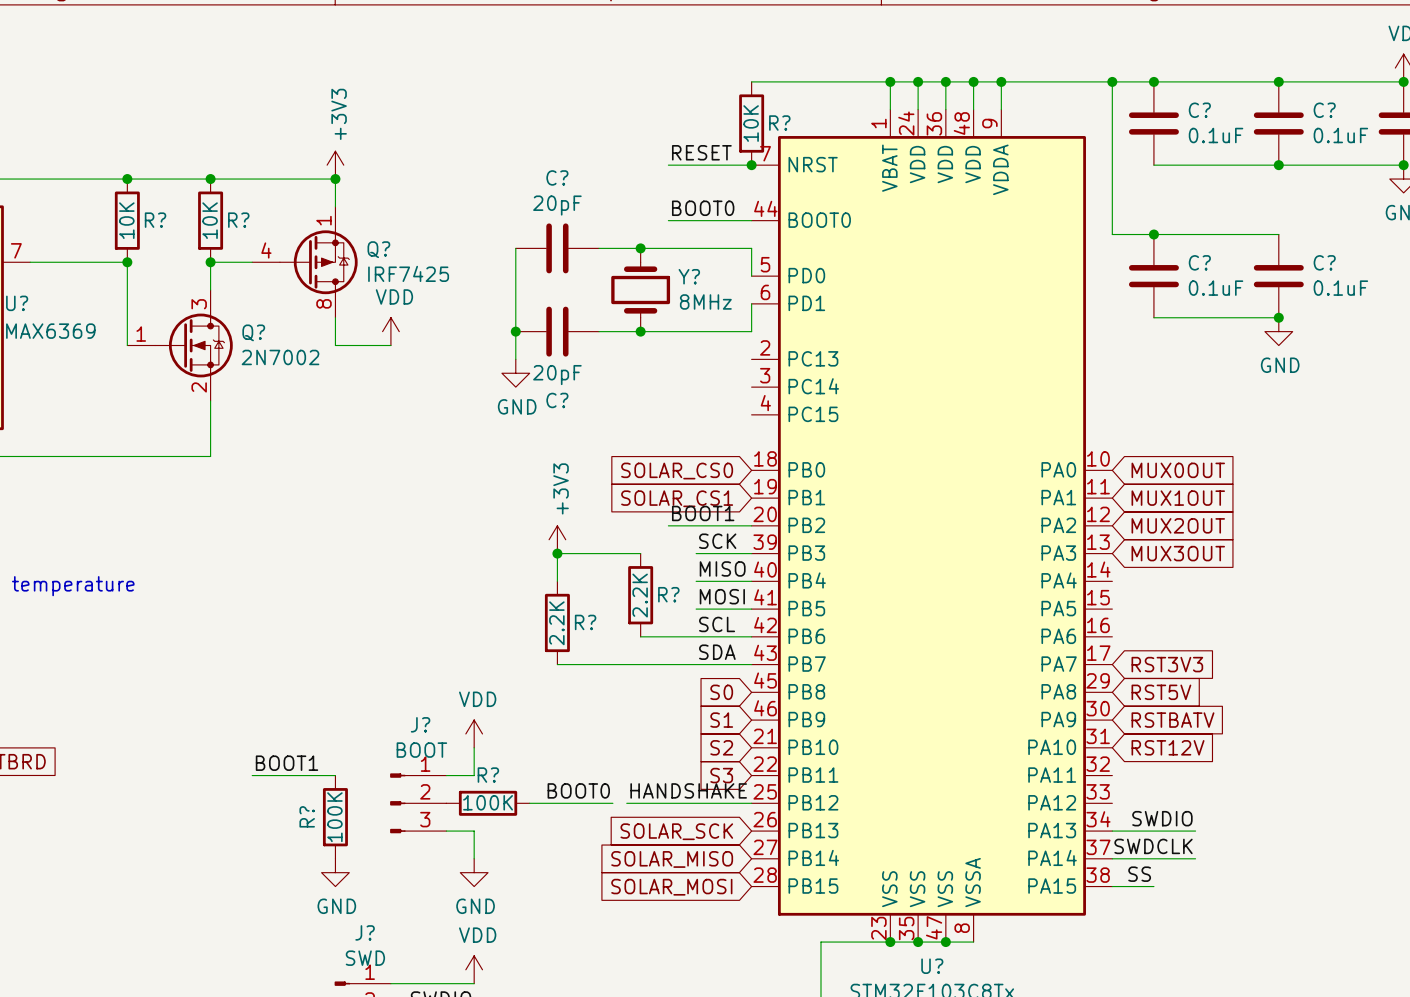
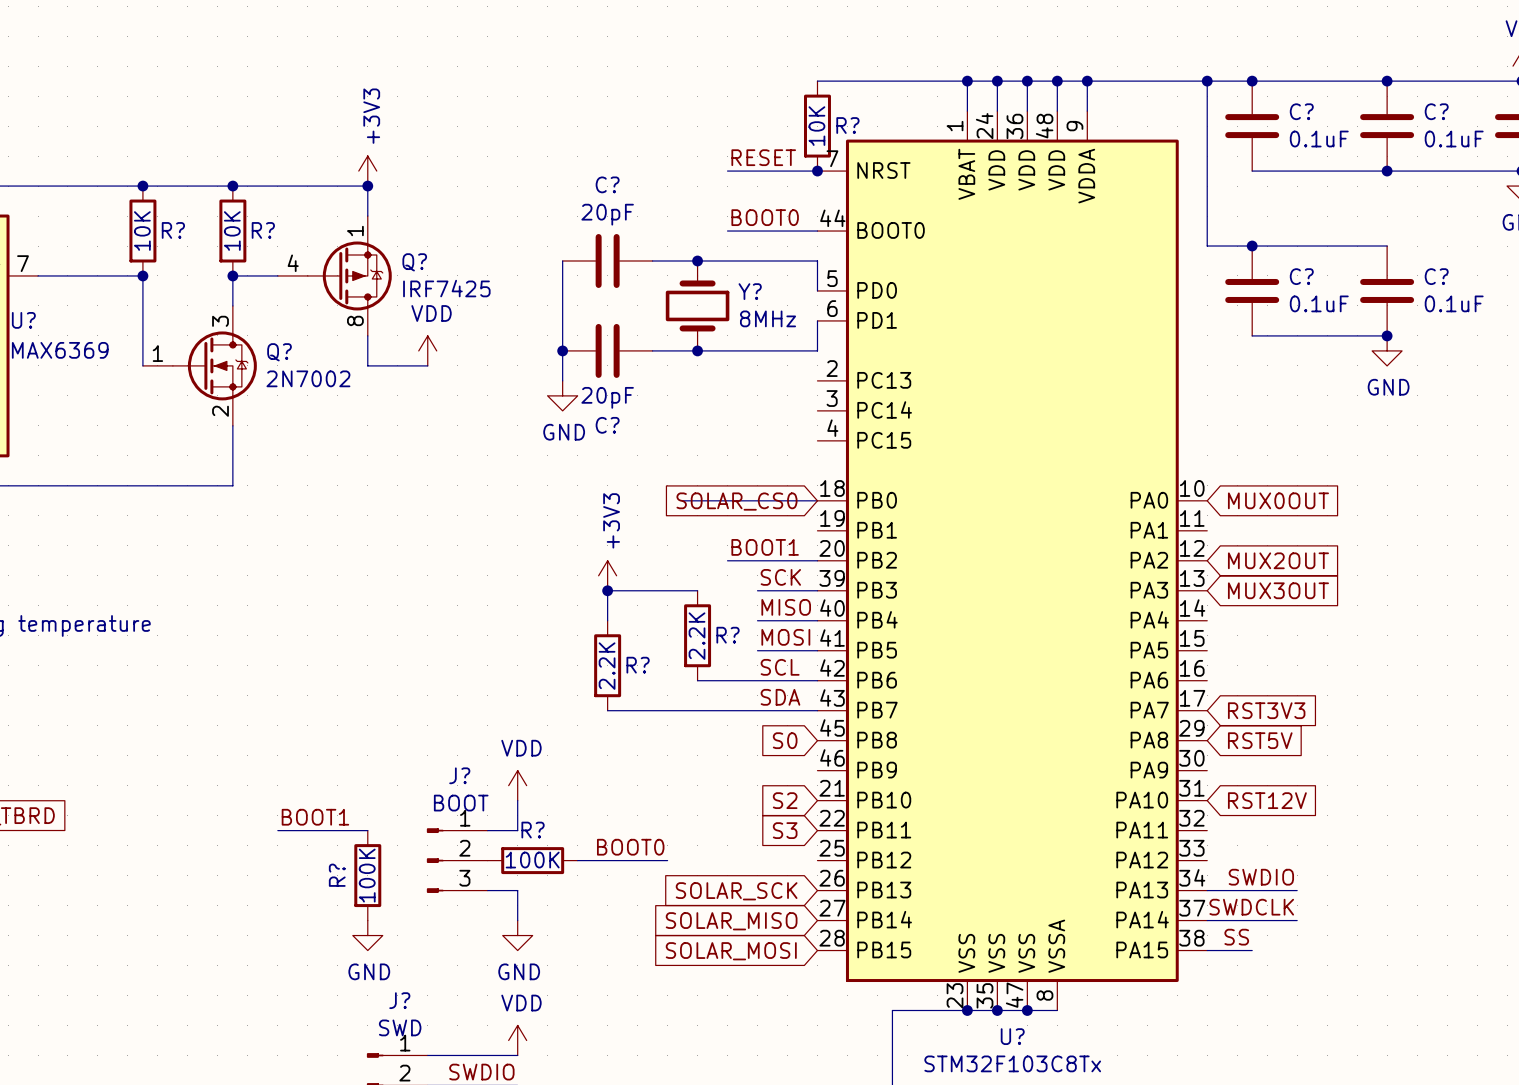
wire: none -> (682, 500) (817, 500)
global label: SOLAR_CS1 (677, 498) -> none
global label: MUX1OUT (1178, 498) -> none
global label: S1 (721, 720) -> none
global label: RSTBATV (1172, 720) -> none
label: HANDSHAKE (688, 790) -> none
wire: (626, 803) (751, 803) -> none

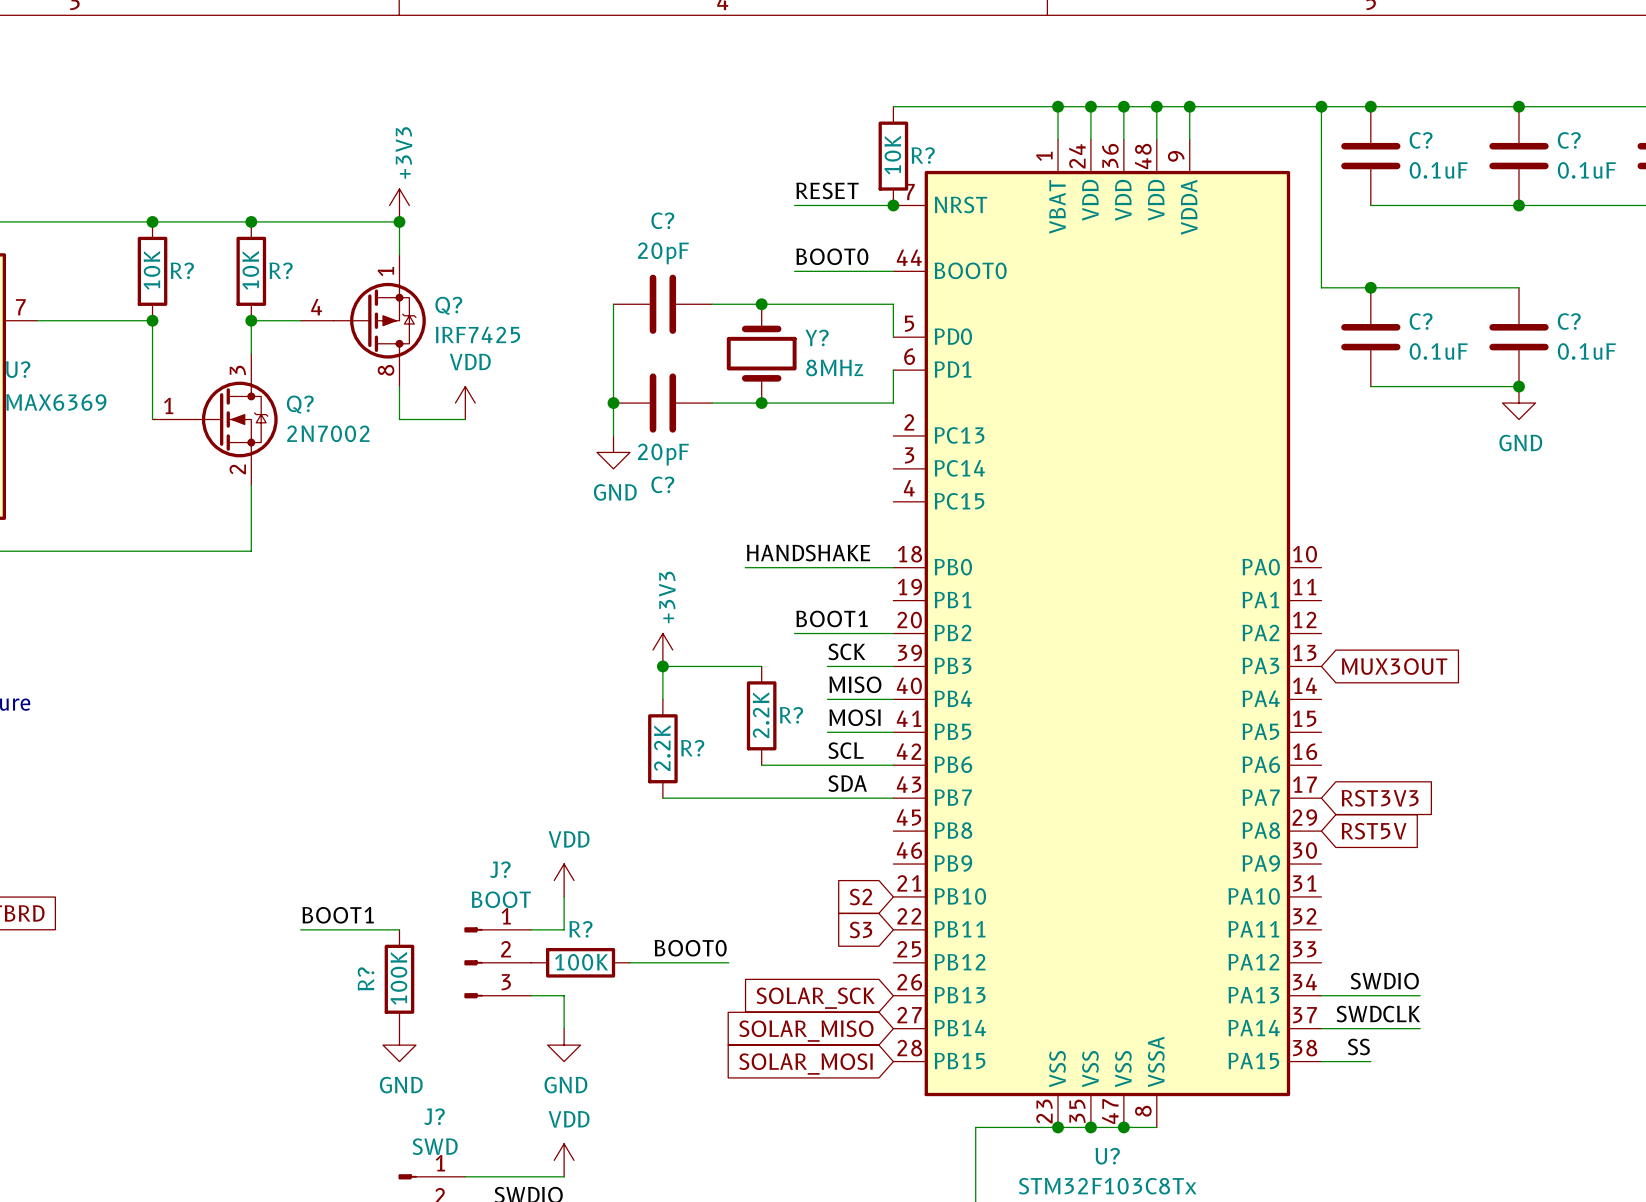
label: none -> HANDSHAKE (808, 553)
global label: MUX0OUT (1278, 500) -> none
global label: SOLAR_CS0 (736, 501) -> none
global label: MUX2OUT (1278, 560) -> none
global label: S0 (785, 740) -> none
global label: RST12V (1267, 800) -> none

